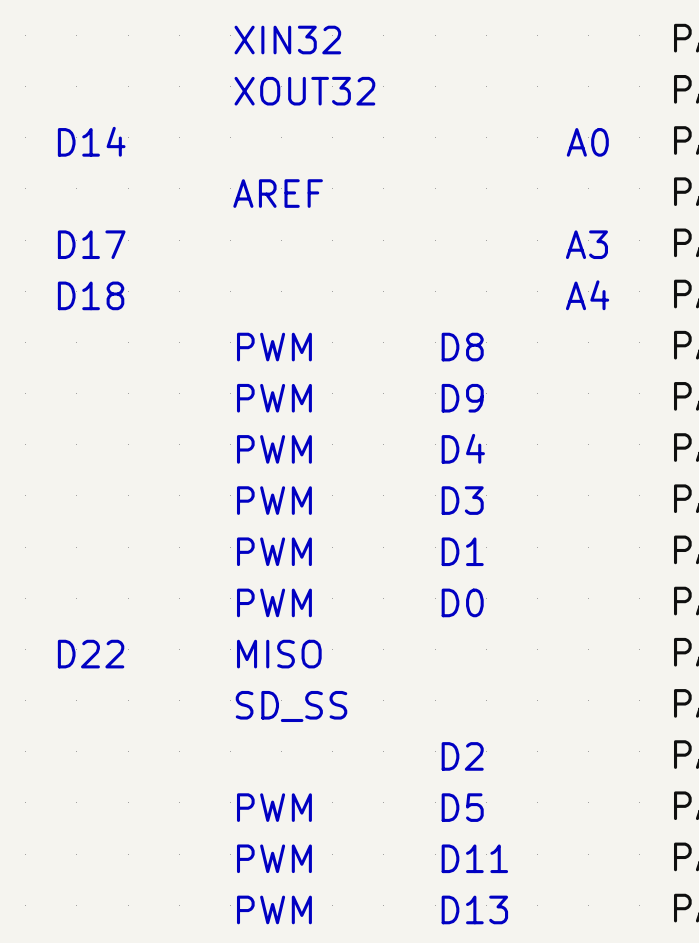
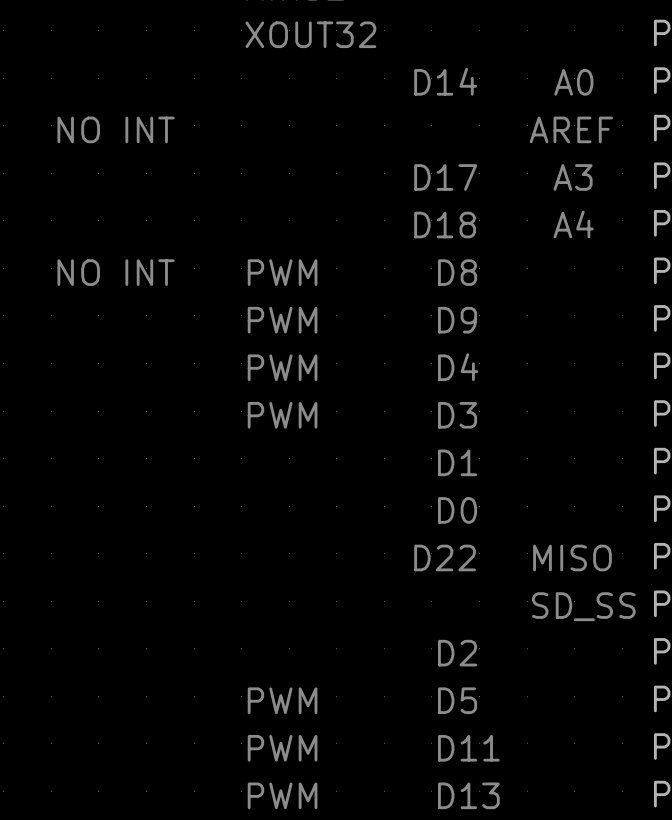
text position: D14 (91, 141) -> D14 (445, 81)
text: none -> NO INT (116, 129)
text position: AREF (278, 193) -> AREF (571, 129)
text position: D17 (91, 244) -> D17 (445, 177)
text position: D18 (91, 295) -> D18 (445, 225)
text: none -> NO INT (116, 272)
text: PWM (274, 551) -> none
text: PWM (274, 602) -> none
text position: D22 (91, 654) -> D22 (445, 558)
text position: MISO (279, 654) -> MISO (572, 558)
text position: SD_SS (291, 706) -> SD_SS (583, 606)

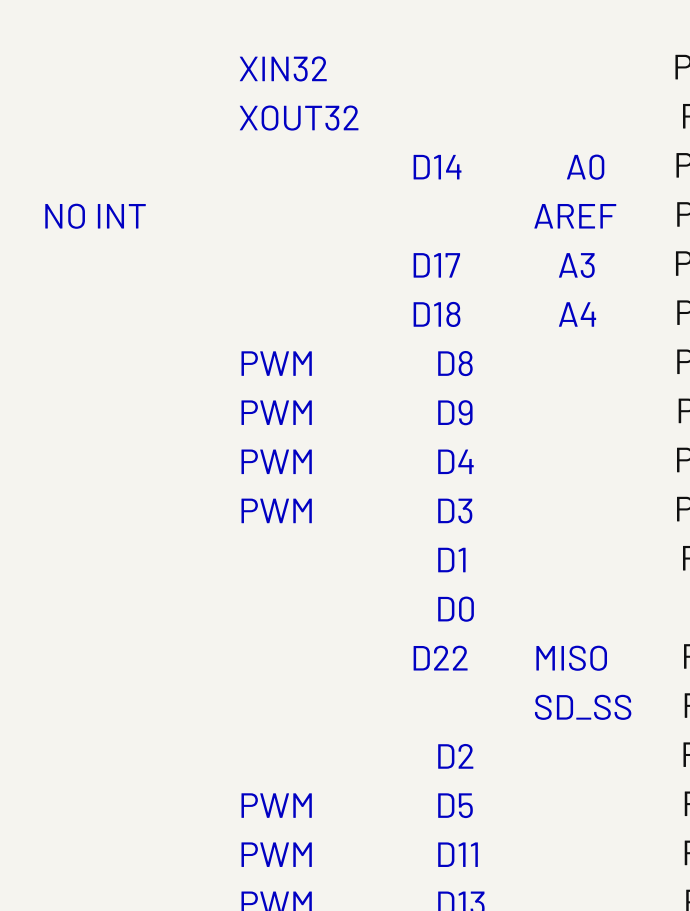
text: NO INT (116, 272) -> none

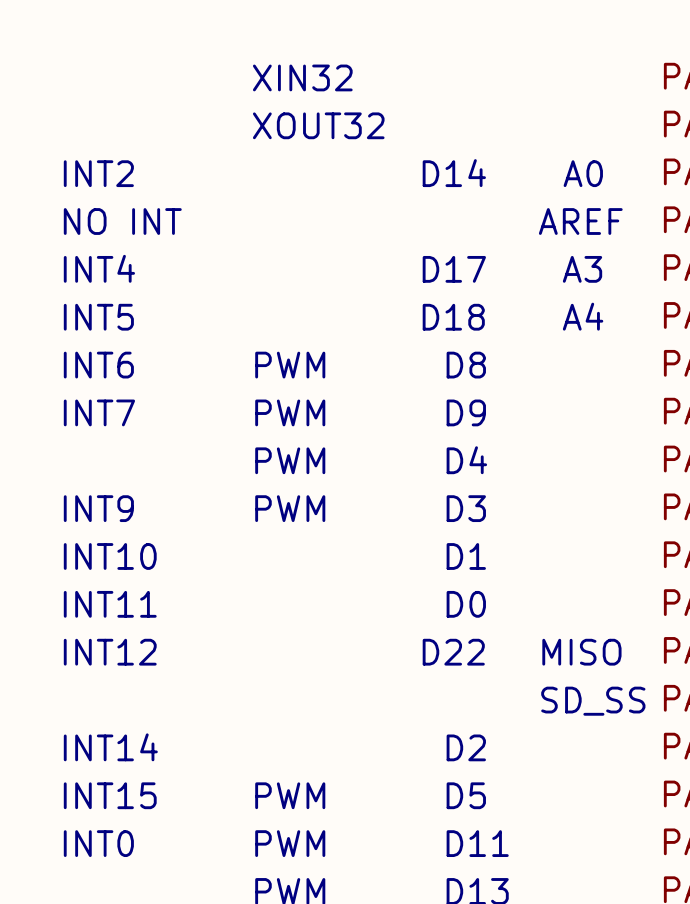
text: none -> INT2 (98, 173)
text: none -> INT4 (99, 268)
text: none -> INT5 (98, 317)
text: none -> INT6 (98, 365)
text: none -> INT7 (99, 412)
text: none -> INT9 (98, 508)
text: none -> INT10 (110, 556)
text: none -> INT11 (110, 604)
text: none -> INT12 (110, 652)
text: none -> INT14 (110, 747)
text: none -> INT15 (110, 795)
text: none -> INT0 (98, 843)

